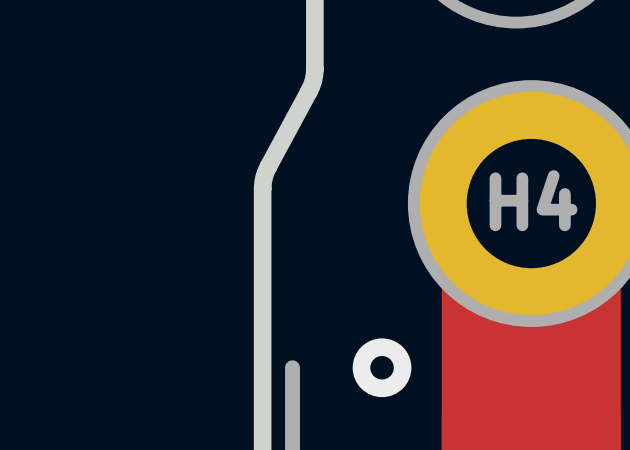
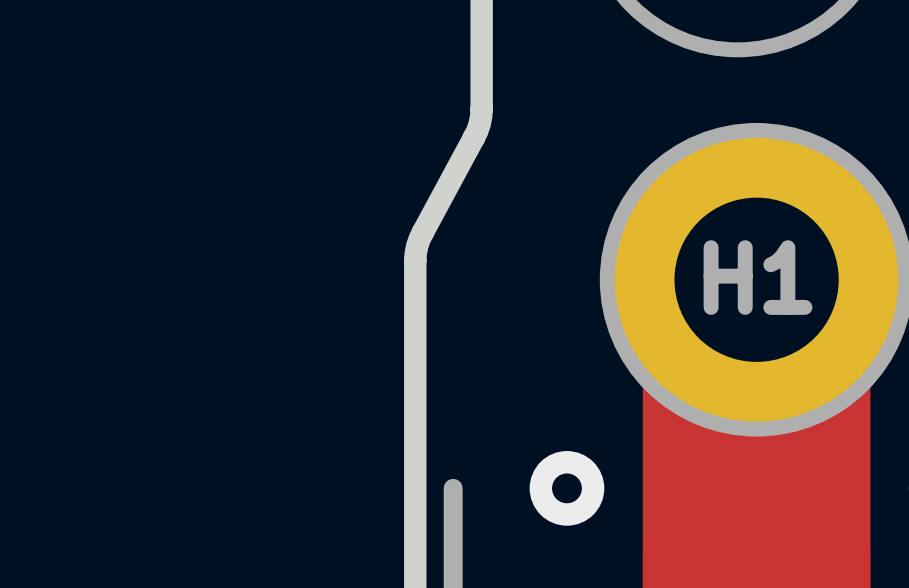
H4 name: H4 (533, 200) -> H1 (758, 277)

